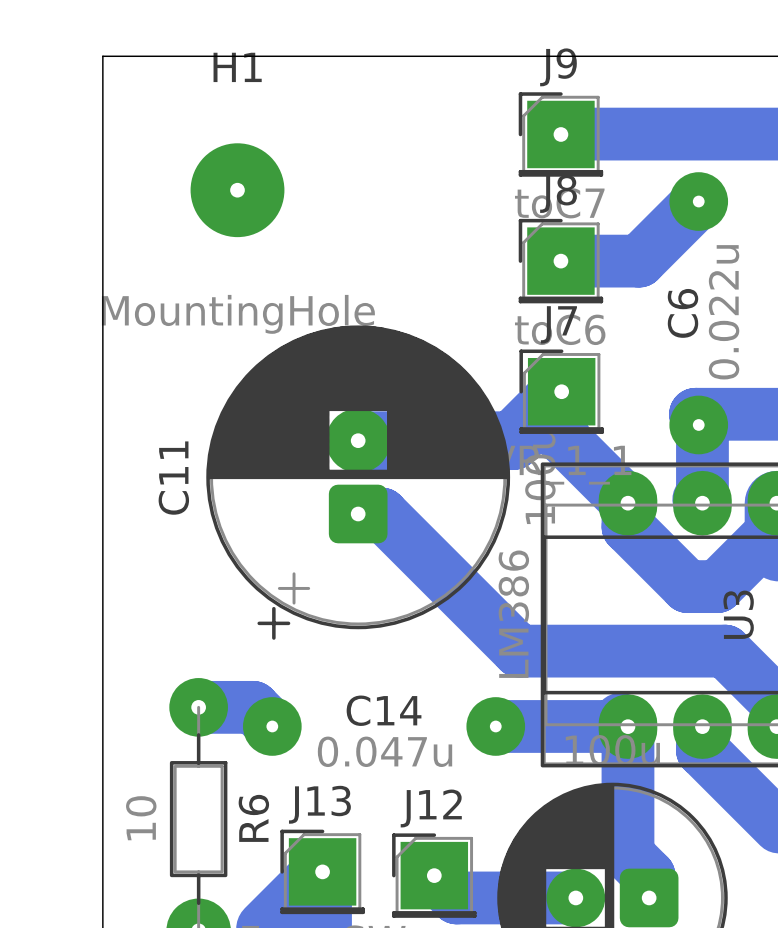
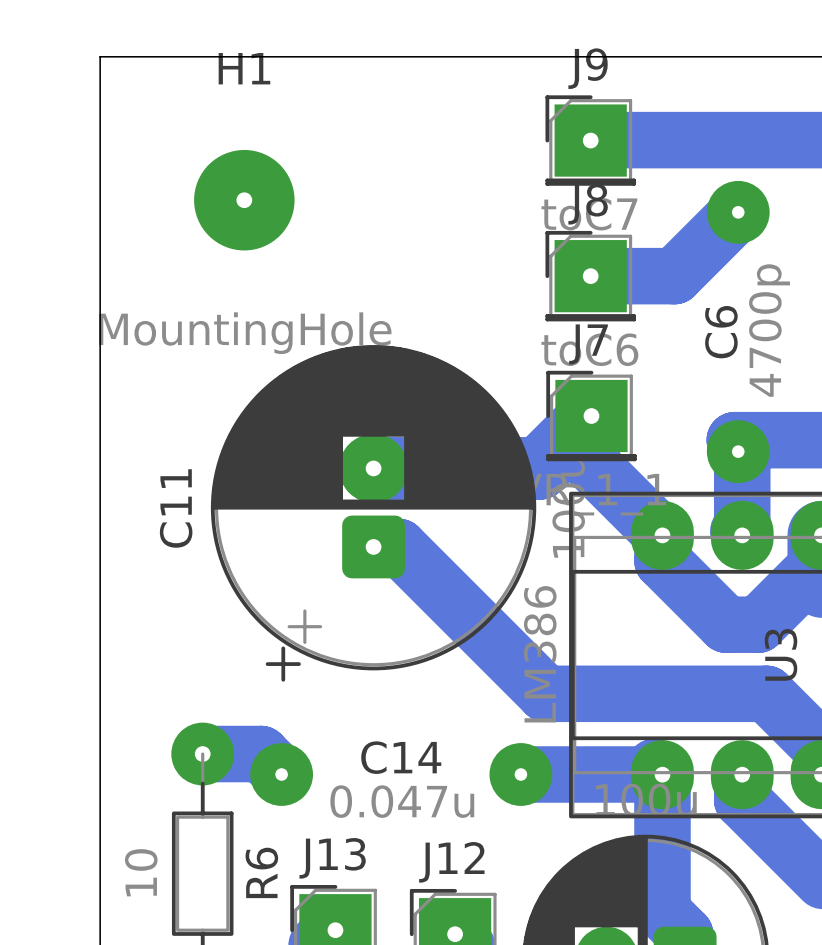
C6 value: 0.022u (724, 312) -> 4700p (769, 330)

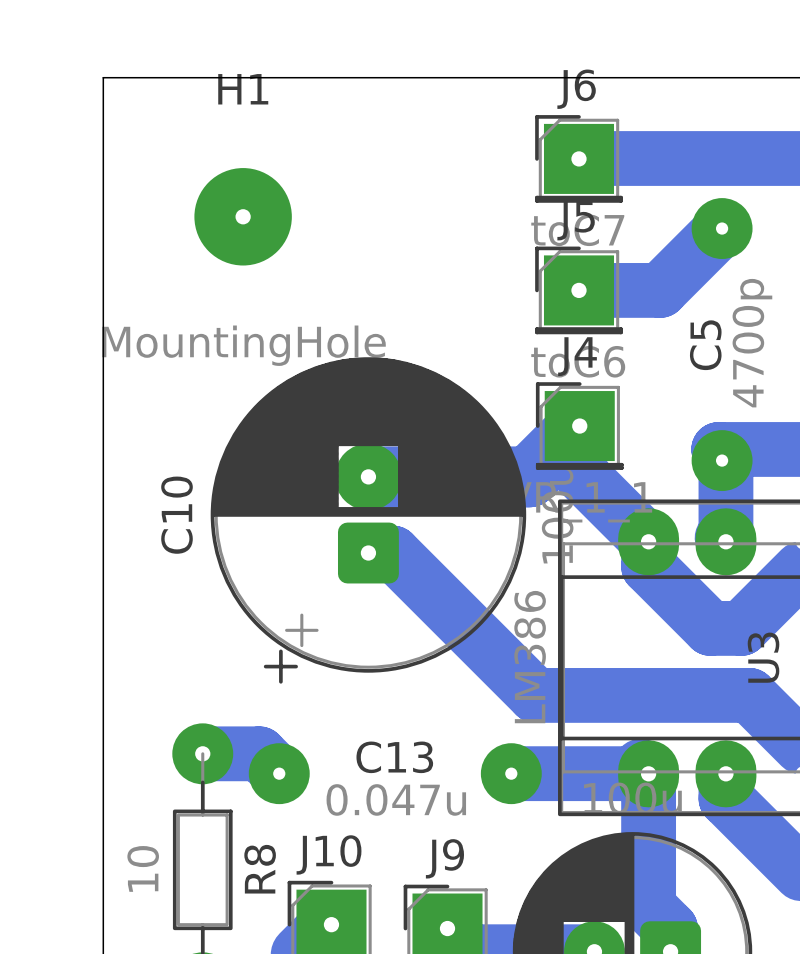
J9 name: J9 (588, 68) -> J6 (576, 89)
J8 name: J8 (588, 204) -> J5 (576, 220)
C6 name: C6 (721, 332) -> C5 (705, 345)
J7 name: J7 (588, 344) -> J4 (577, 356)
C11 name: C11 (176, 508) -> C10 (177, 515)
C14 name: C14 (401, 757) -> C13 (394, 757)
J13 name: J13 (332, 858) -> J10 (329, 854)
J12 name: J12 (451, 862) -> J9 (444, 858)
R6 name: R6 (261, 872) -> R8 (260, 869)

